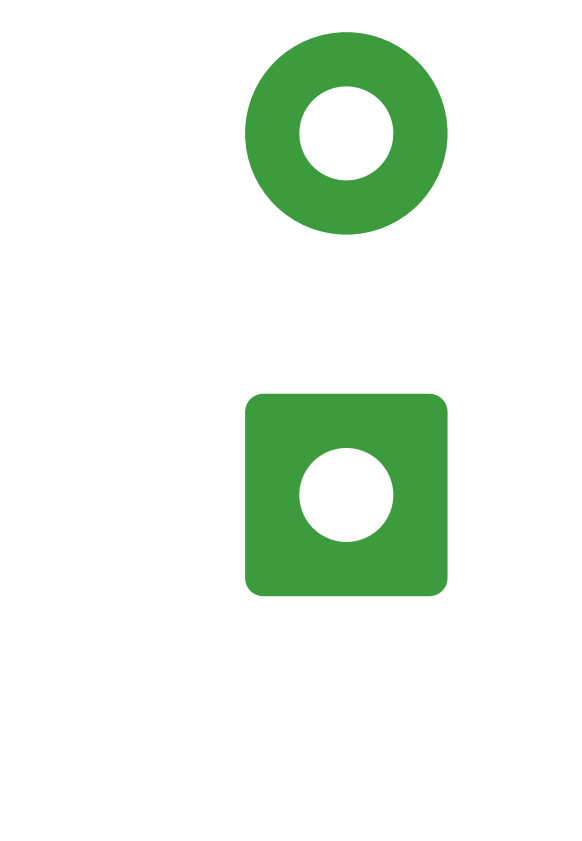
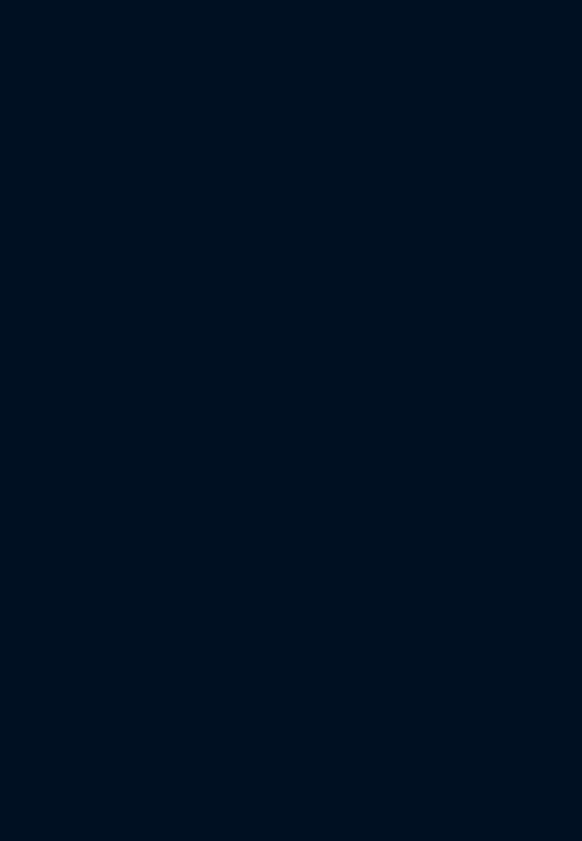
part: (346, 314) -> none

